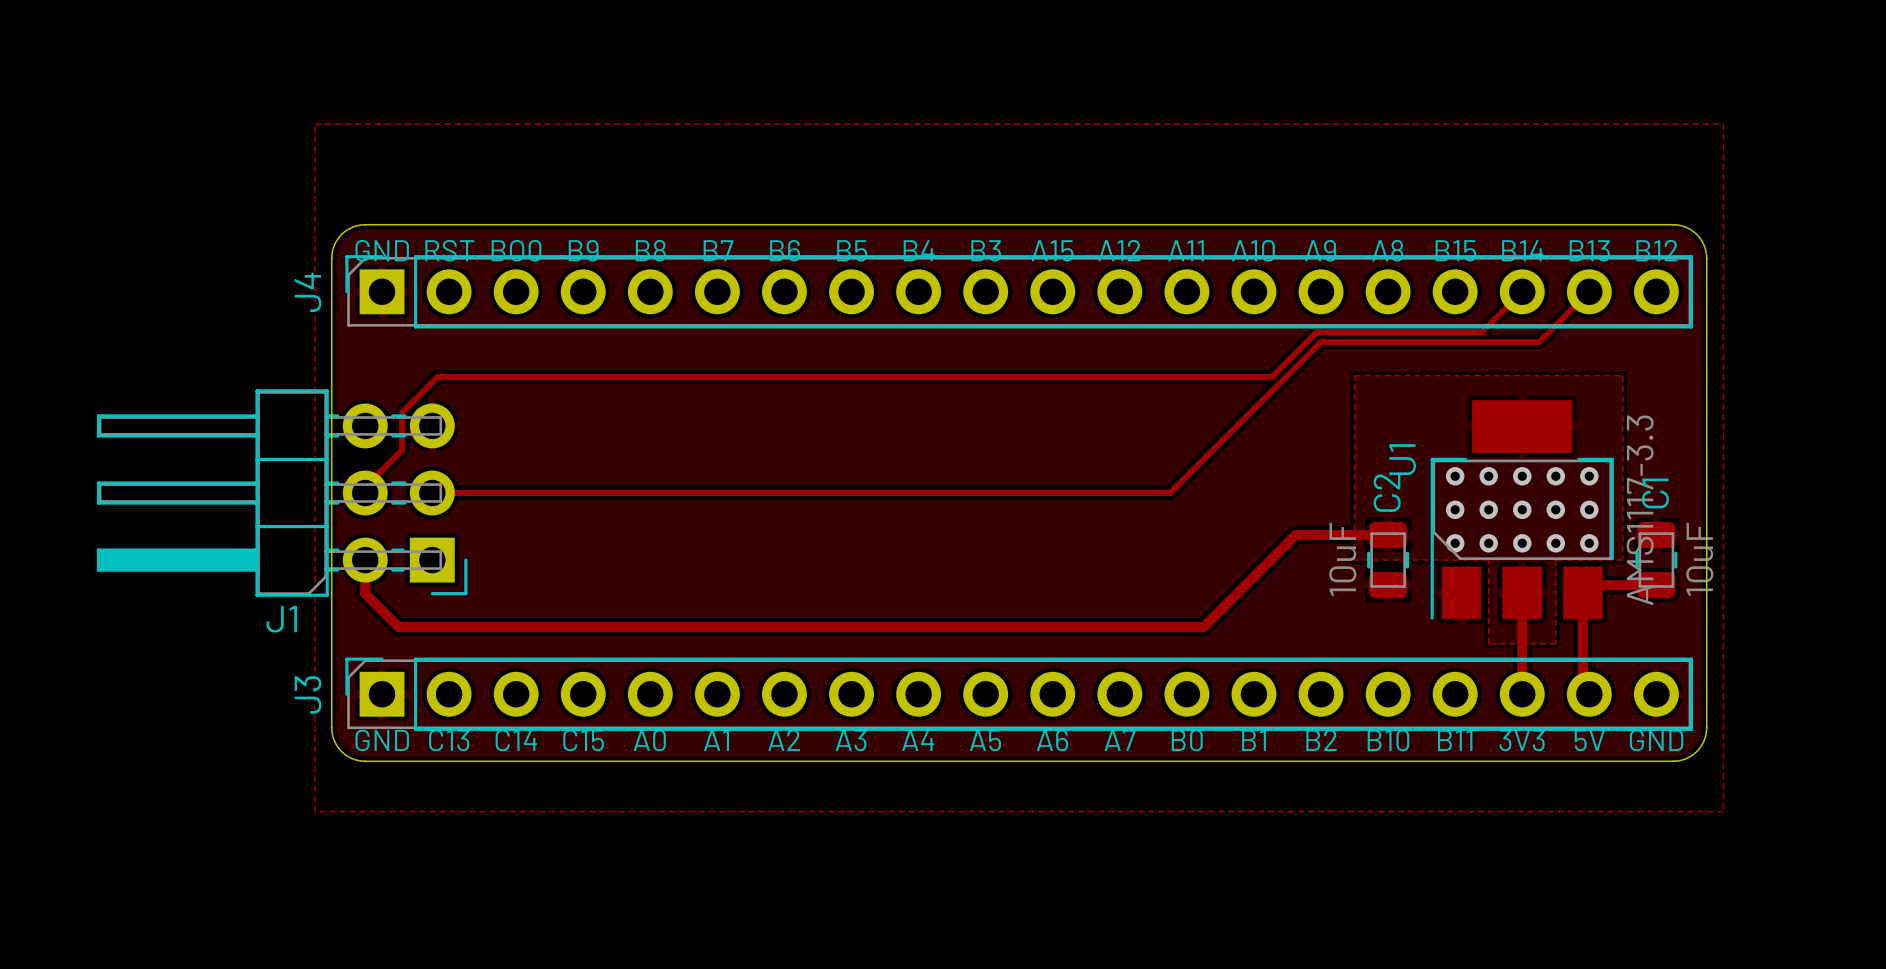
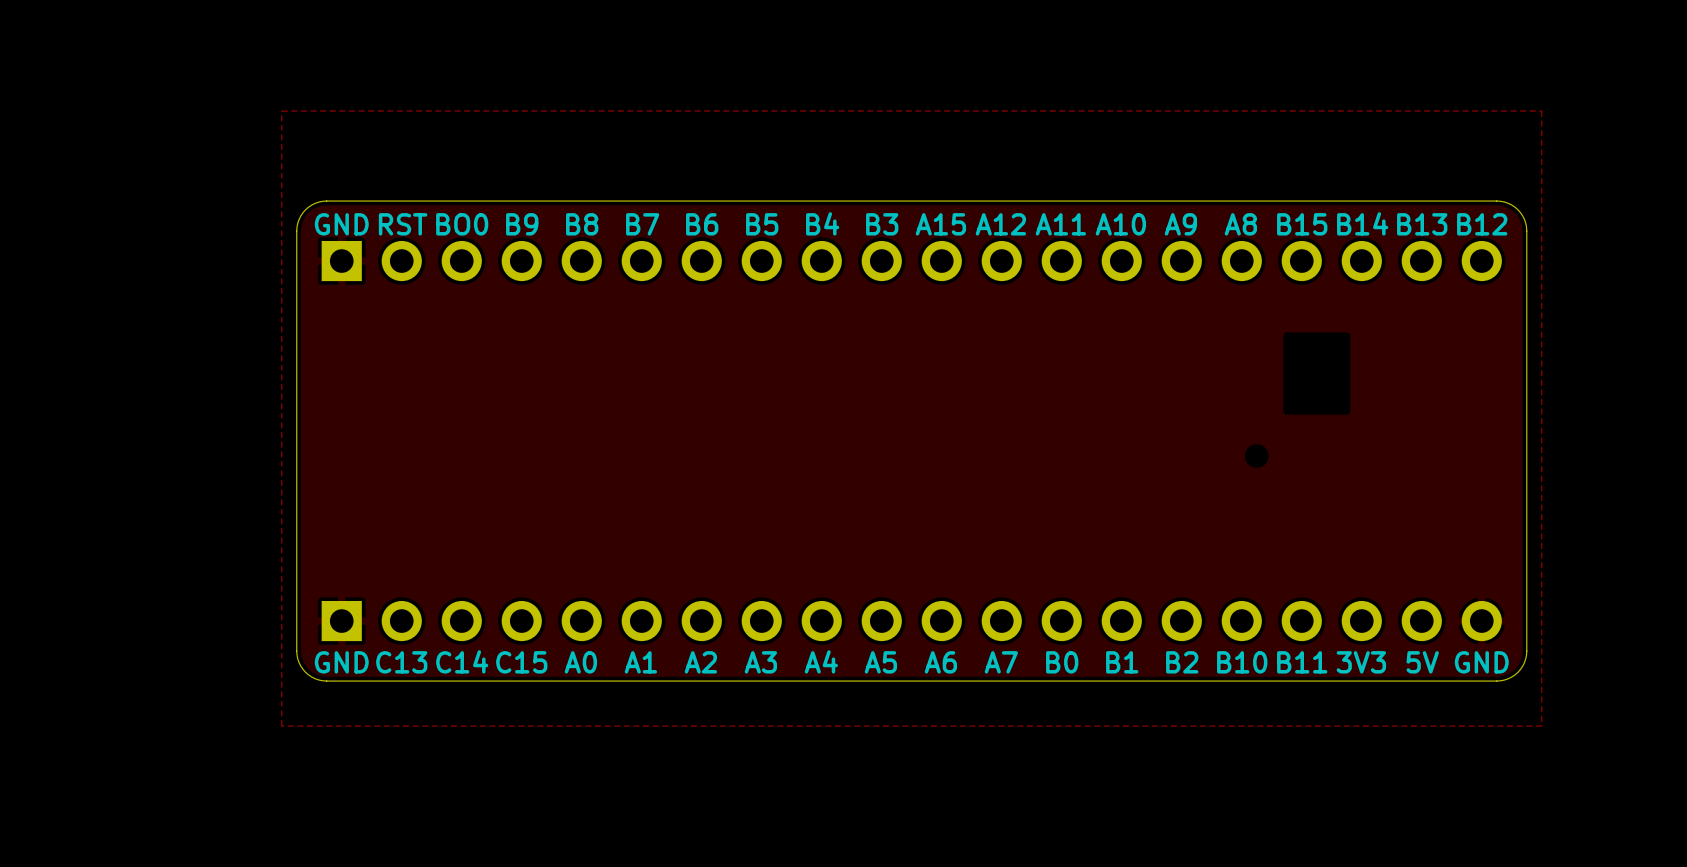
J4 side: top (1019, 291) -> bottom (911, 261)
track: (1522, 291) (1482, 332) (1316, 332) (1272, 376) (437, 376) (402, 412) (402, 450) (365, 487) (365, 493) -> none
track: (1589, 291) (1539, 342) (1321, 342) (1170, 493) (432, 493) -> none
zone outline: (1354, 375) (1354, 560) (1488, 560) (1488, 643) (1555, 643) (1555, 560) (1622, 560) (1622, 375) (1354, 375) -> none
via: (1455, 476) -> none
via: (1488, 476) -> none
via: (1522, 476) -> none
via: (1555, 476) -> none
via: (1589, 476) -> none
J1: (282, 493) -> none
via: (1455, 509) -> none
via: (1488, 509) -> none
U1: AMS1117-3.3 (1522, 509) -> none
via: (1522, 509) -> none
via: (1555, 509) -> none
via: (1589, 509) -> none
track: (1388, 535) (1295, 535) (1203, 627) (398, 627) (365, 593) (365, 560) -> none
via: (1455, 543) -> none
via: (1488, 543) -> none
via: (1522, 543) -> none
via: (1555, 543) -> none
via: (1589, 543) -> none
C2: 10uF (1388, 560) -> none
C1: 10uF (1656, 560) -> none
track: (1656, 585) (1590, 585) (1583, 592) -> none
track: (1522, 592) (1522, 694) -> none
track: (1583, 592) (1583, 687) (1589, 694) -> none
J3 side: top (1019, 694) -> bottom (911, 621)

